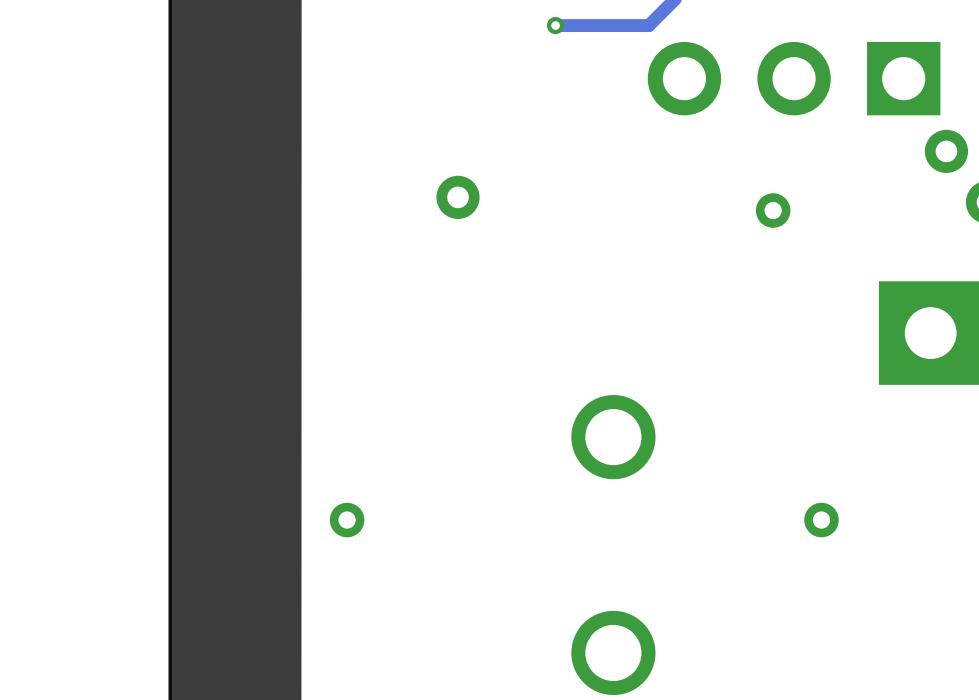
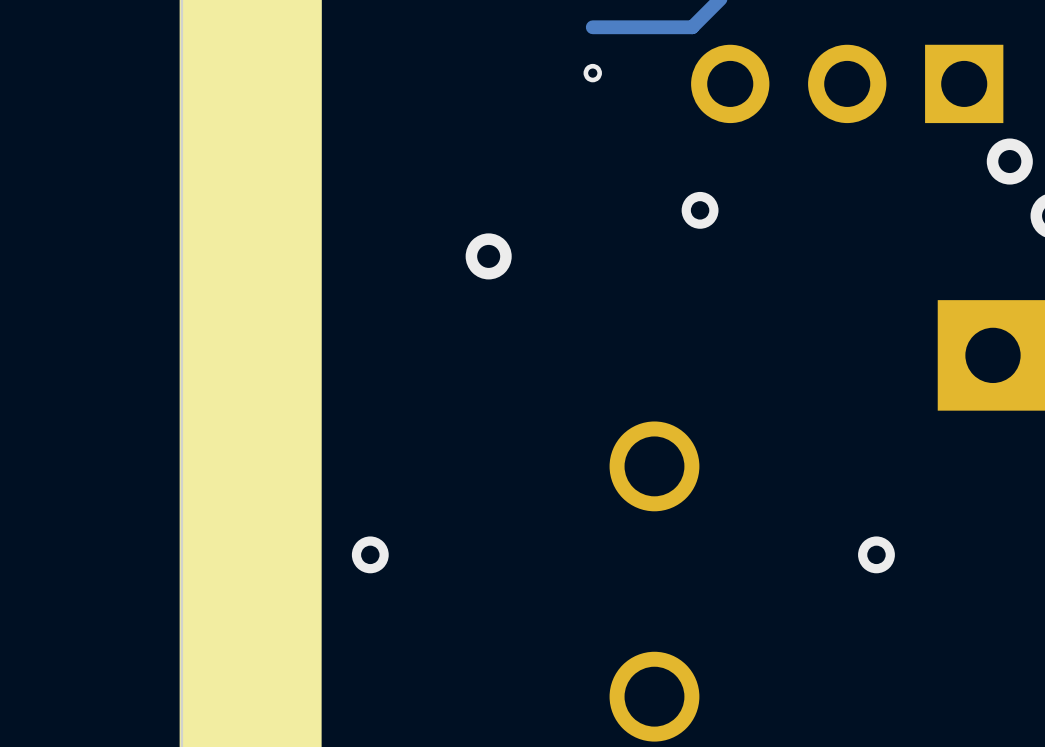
via position: (555, 25) -> (592, 73)
via position: (458, 197) -> (488, 256)
via position: (773, 210) -> (700, 210)

